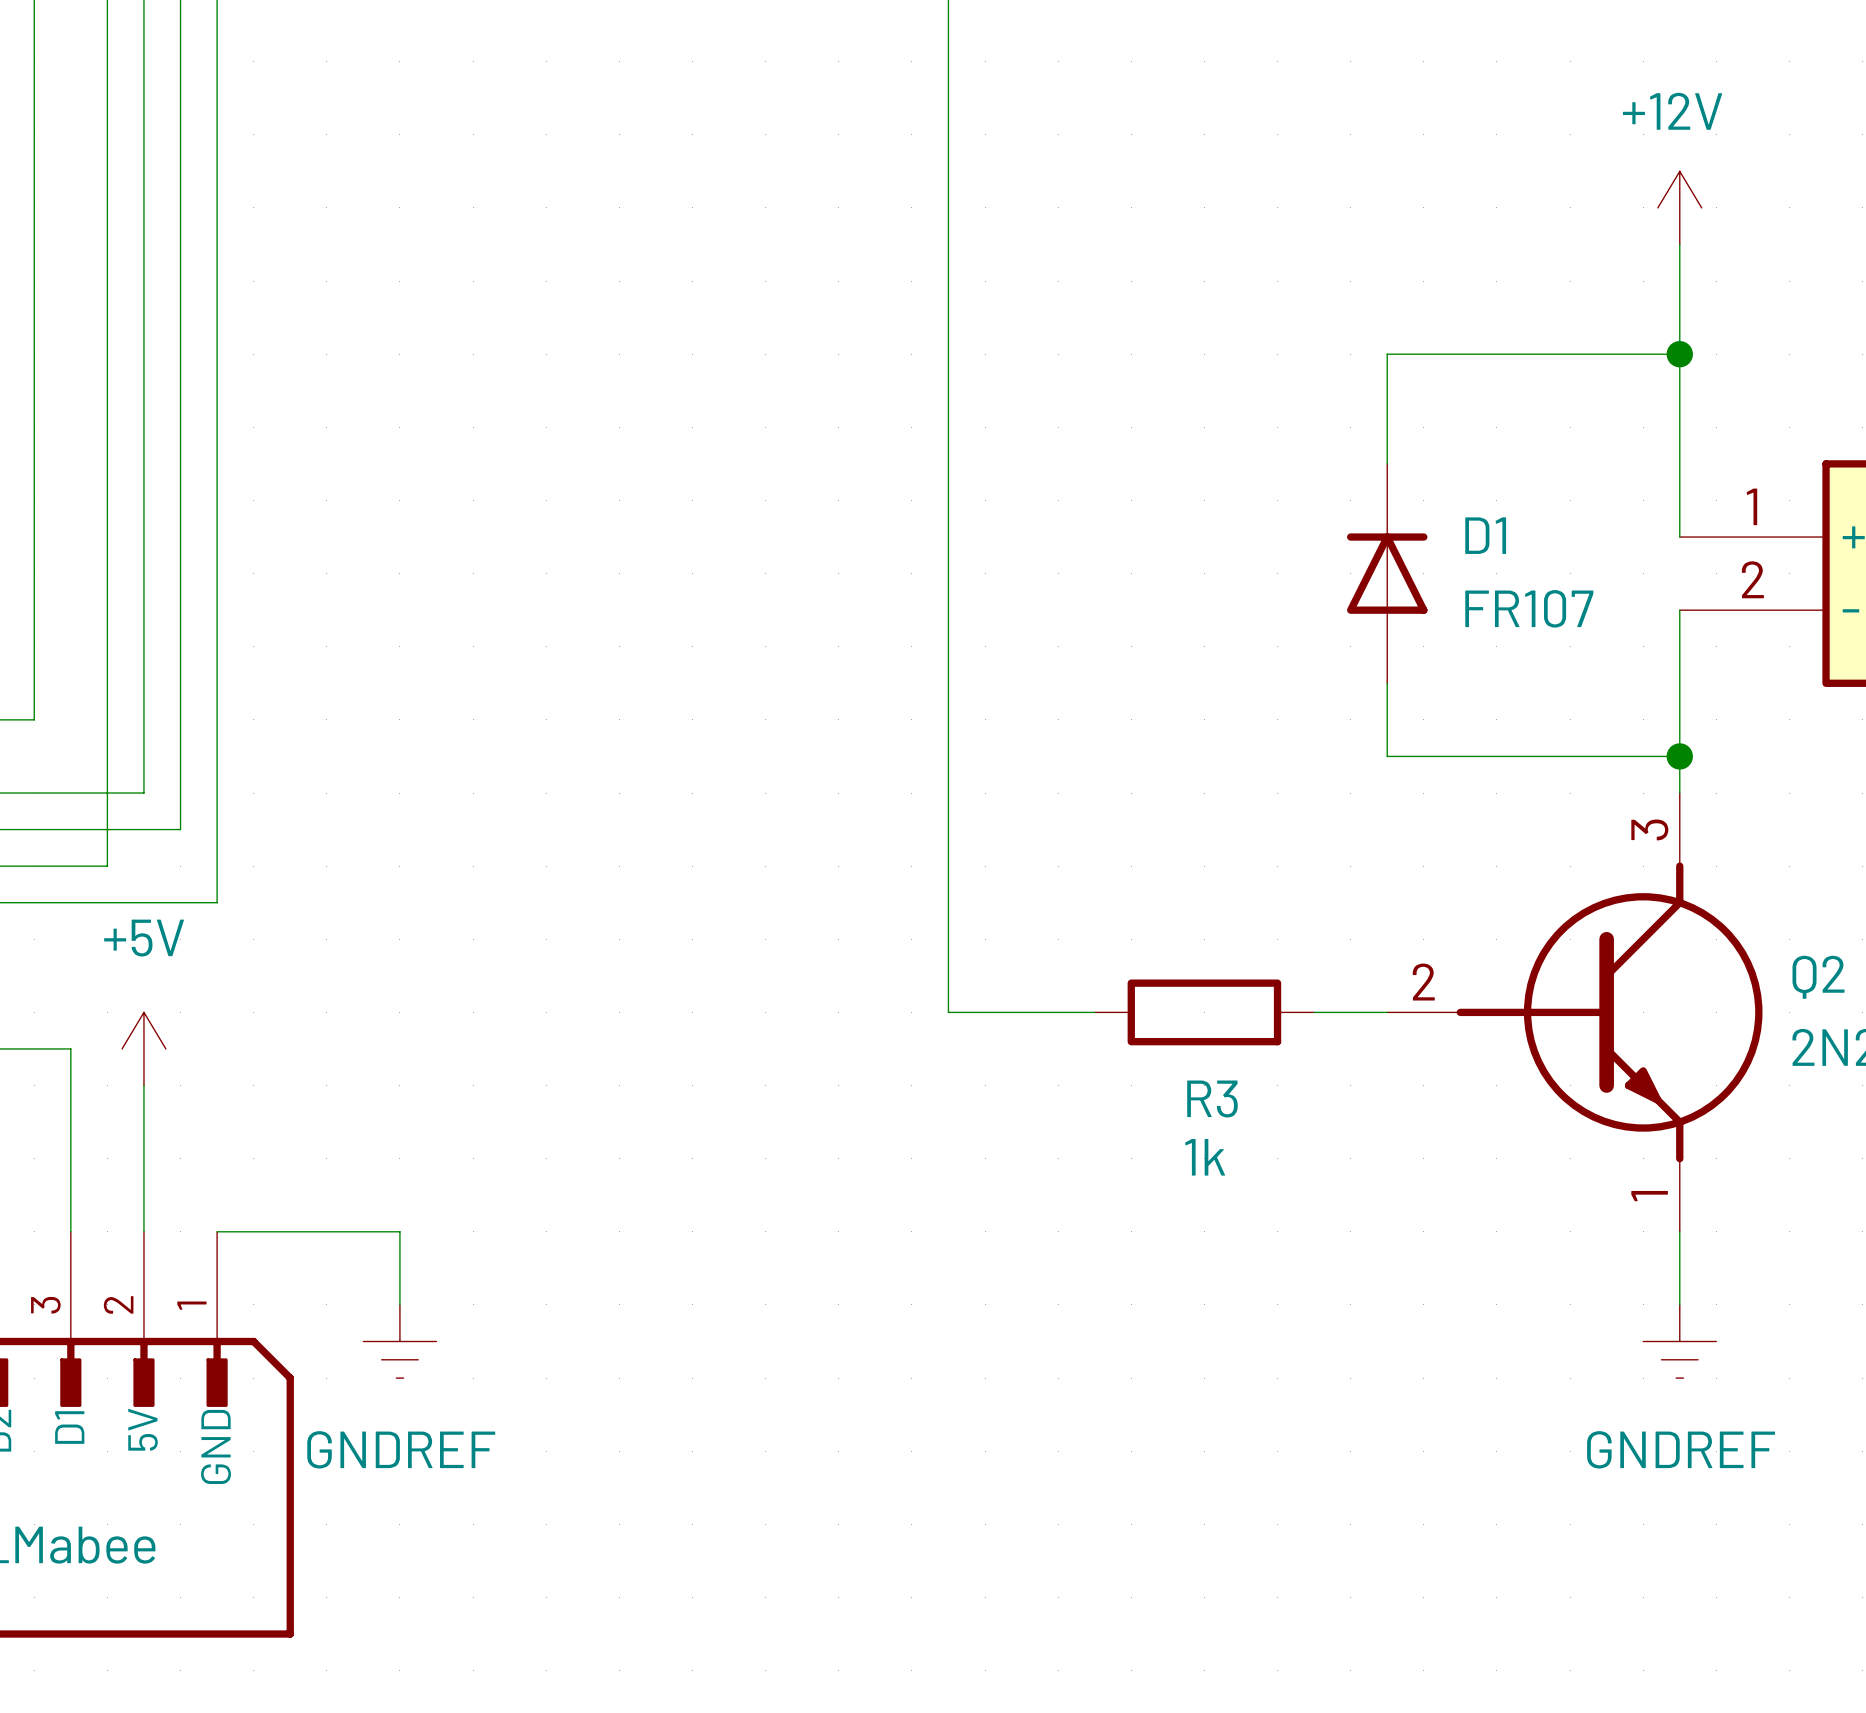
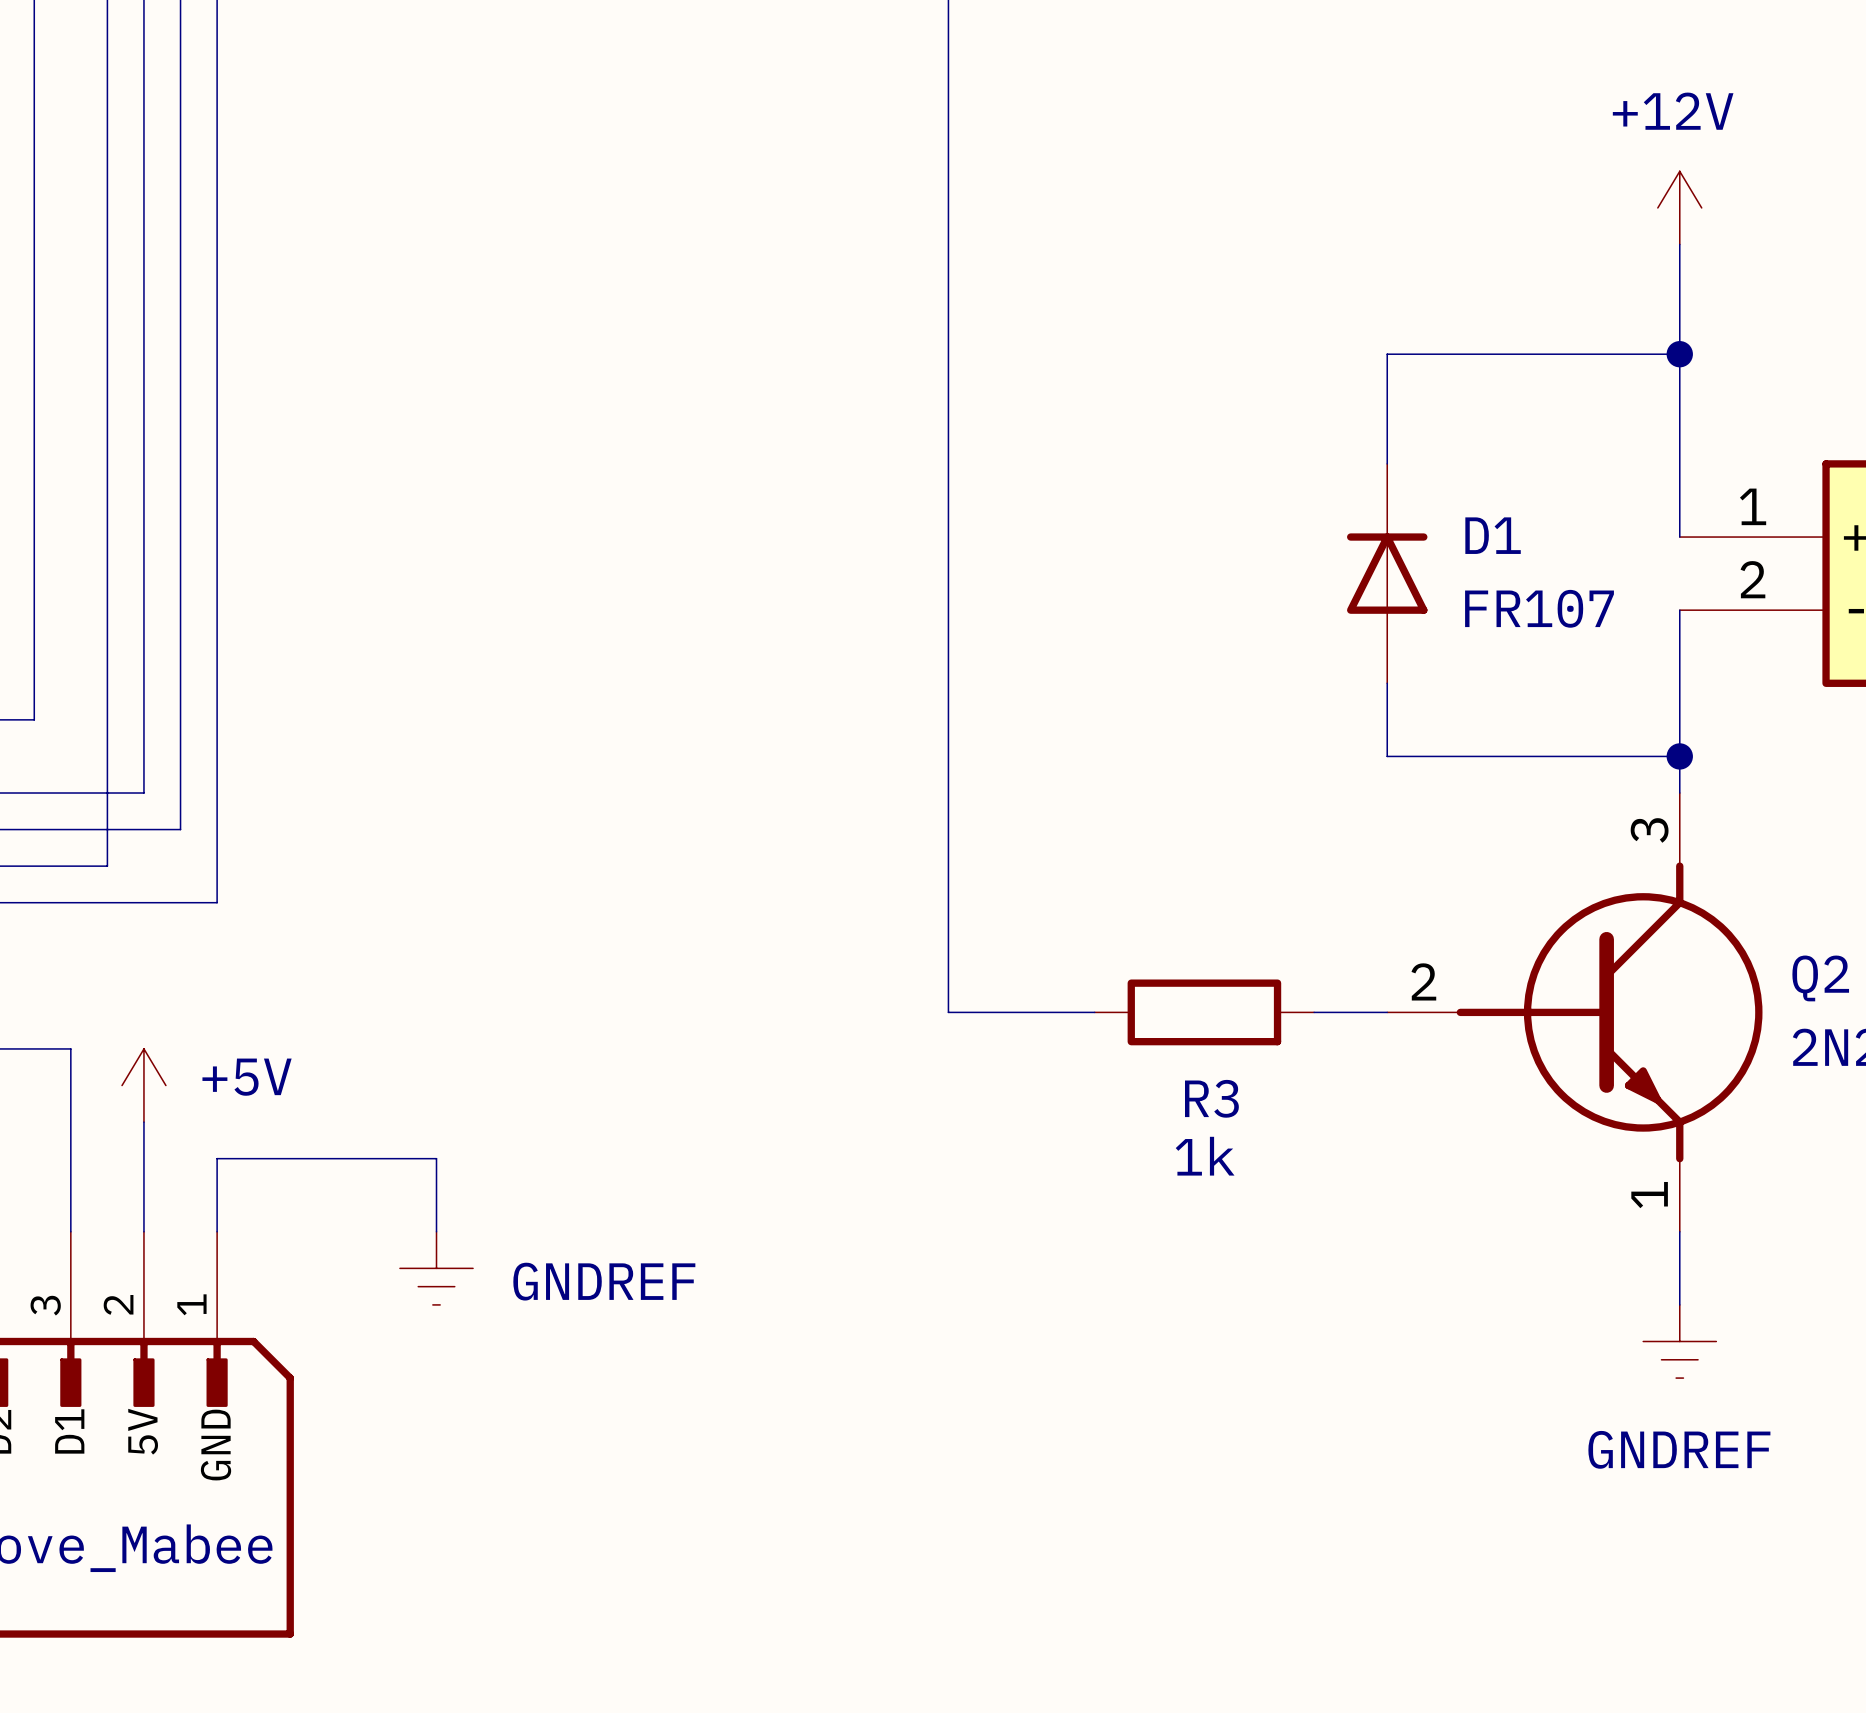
power symbol text position: +5V (144, 938) -> +5V (247, 1077)
power symbol position: +5V (143, 1048) -> +5V (143, 1085)
wire: (217, 1231) (399, 1231) (399, 1304) -> (217, 1231) (217, 1158) (436, 1158) (436, 1231)
power symbol position: GNDREF (399, 1341) -> GNDREF (436, 1268)
power symbol text position: GNDREF (401, 1449) -> GNDREF (604, 1281)

